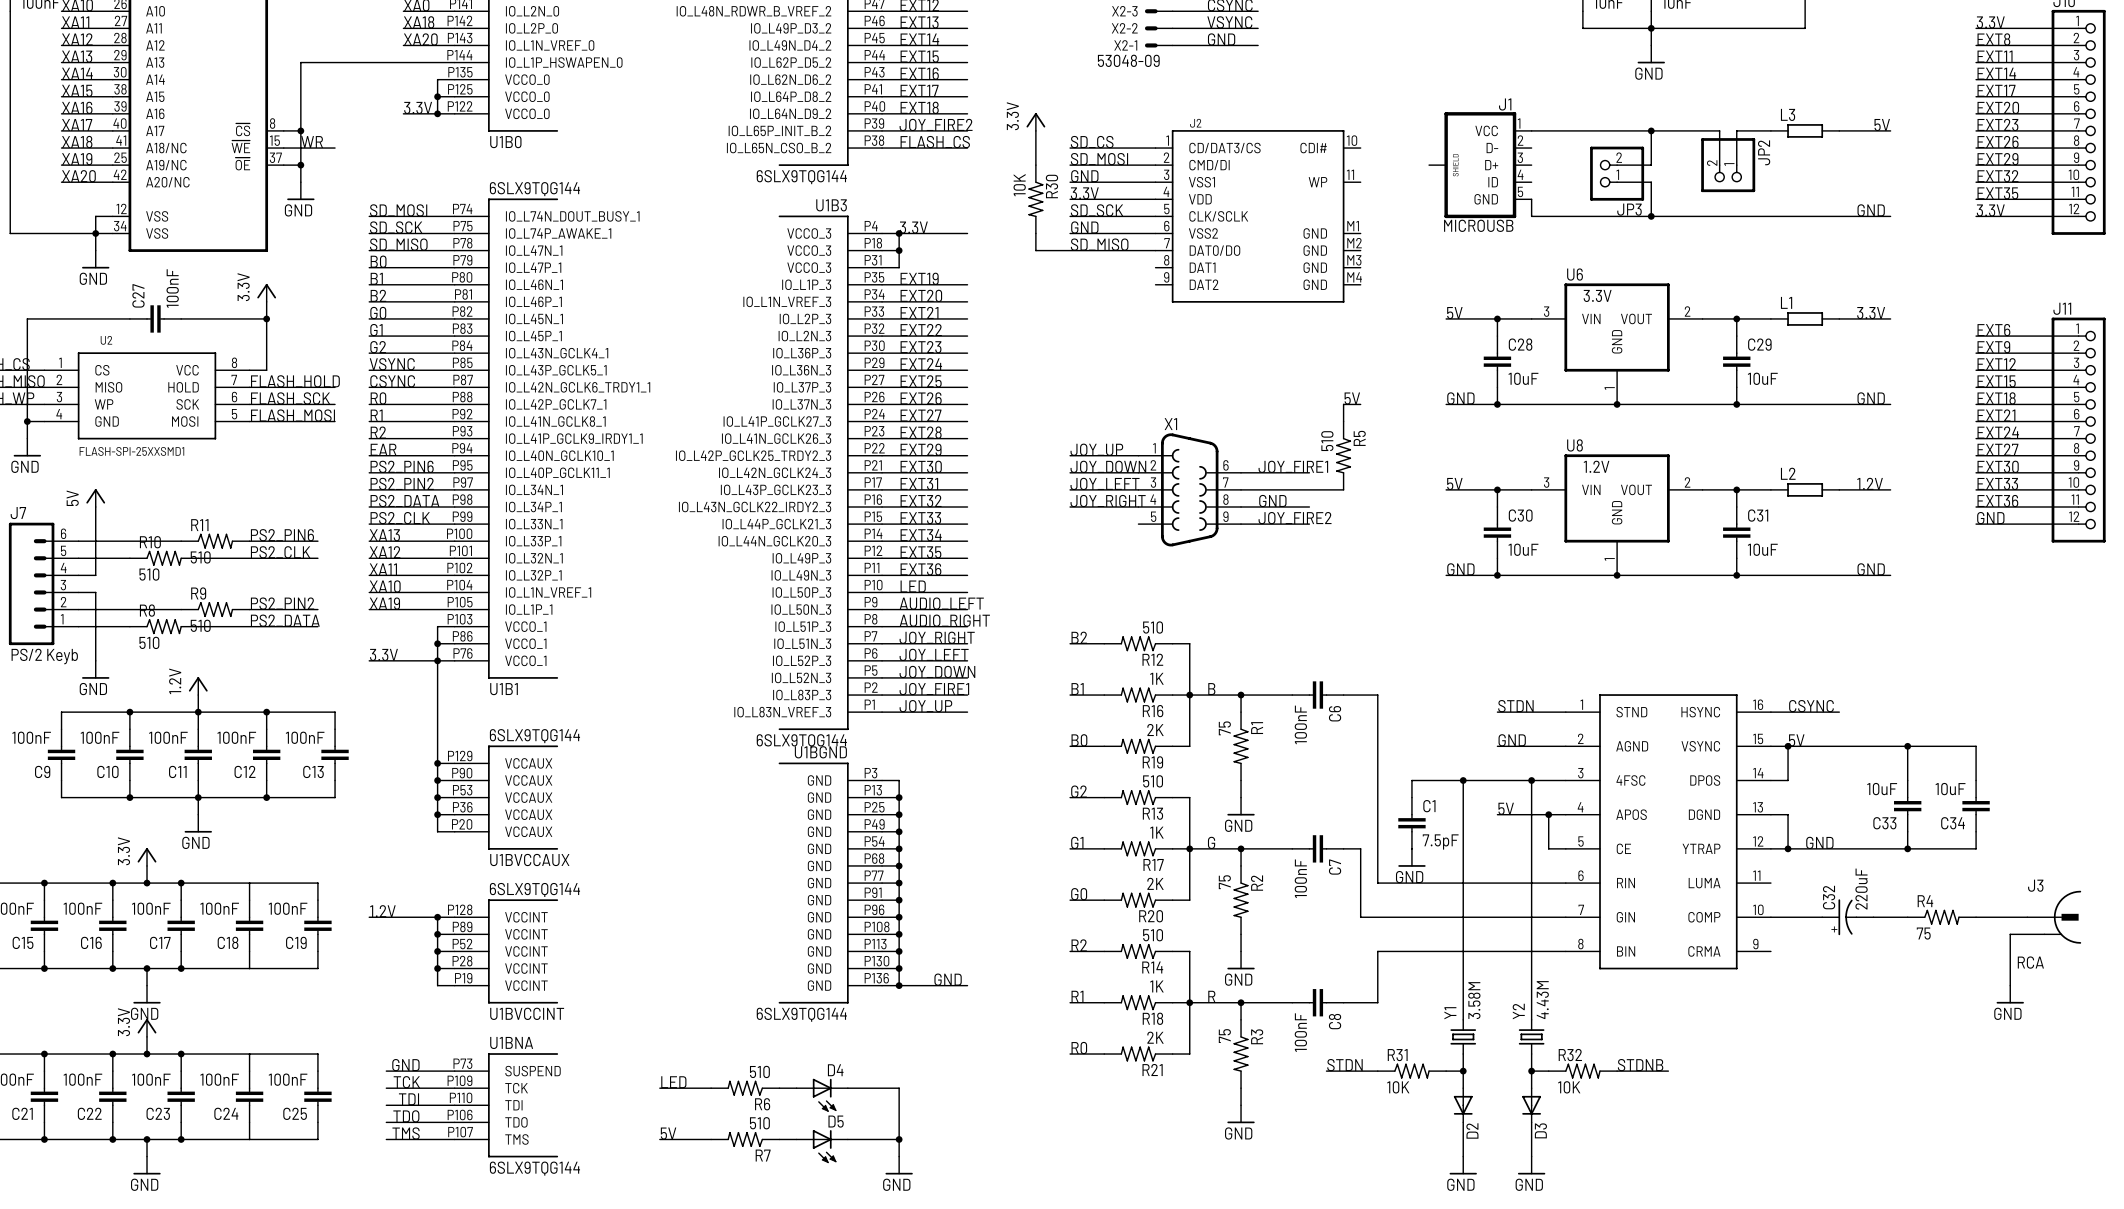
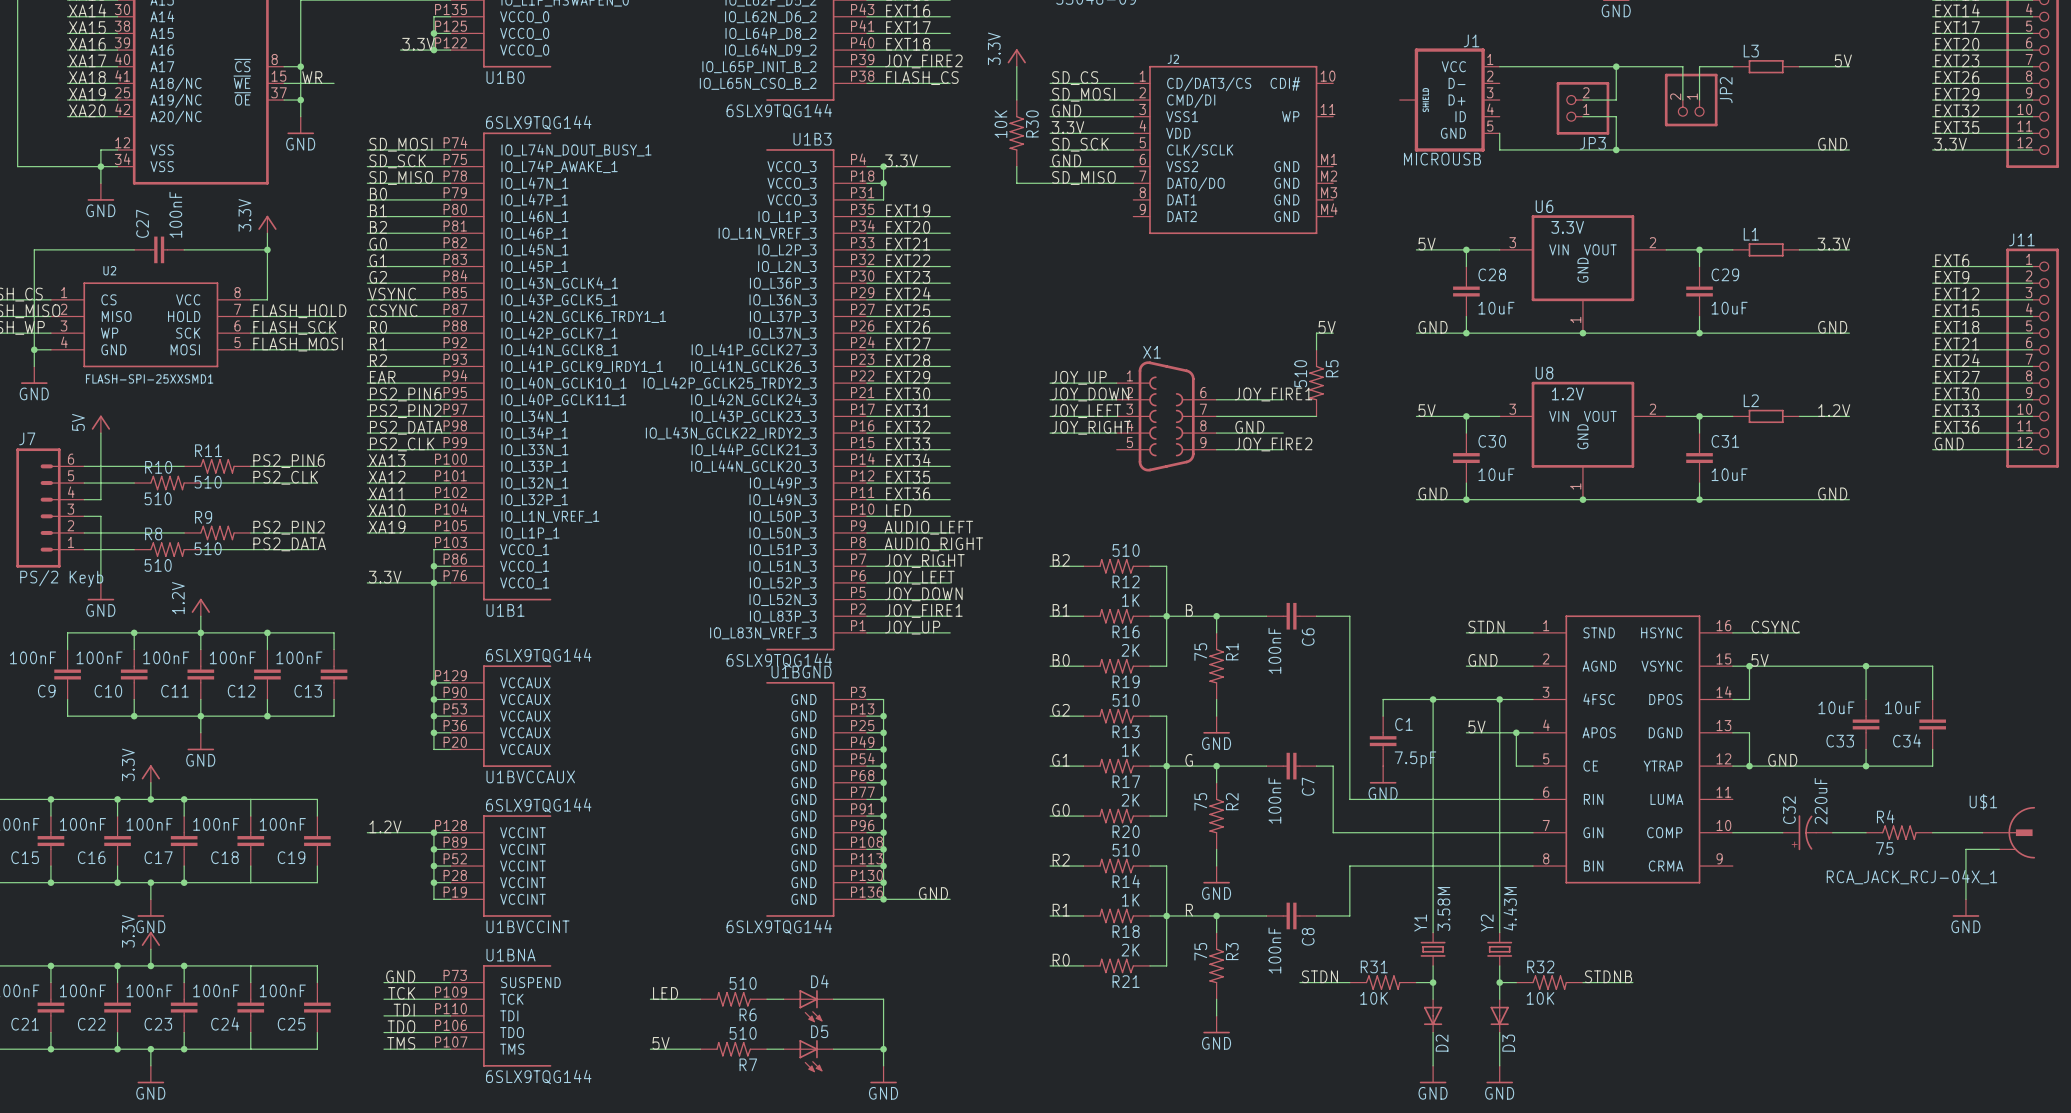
J3 name: J3 (2035, 885) -> U$1 (1983, 801)
J3 value: RCA (2030, 962) -> RCA_JACK_RCJ-04X_1 (1911, 877)

